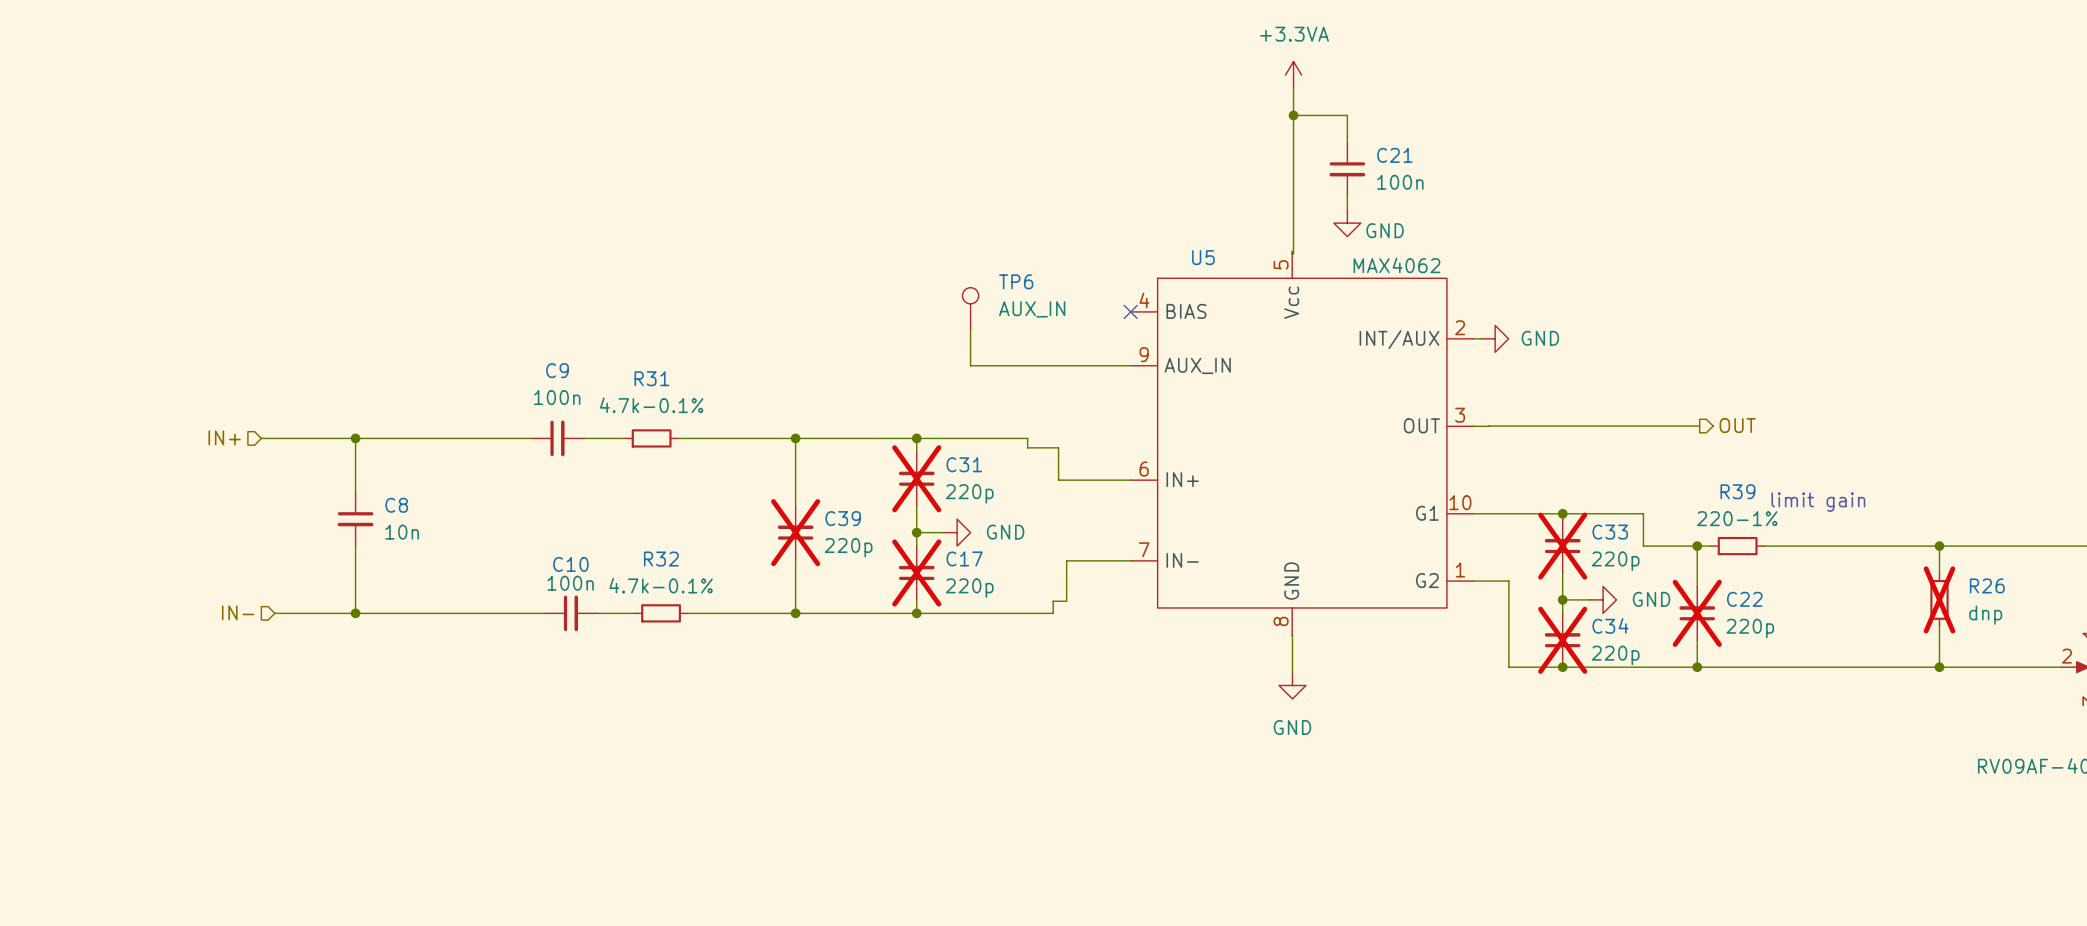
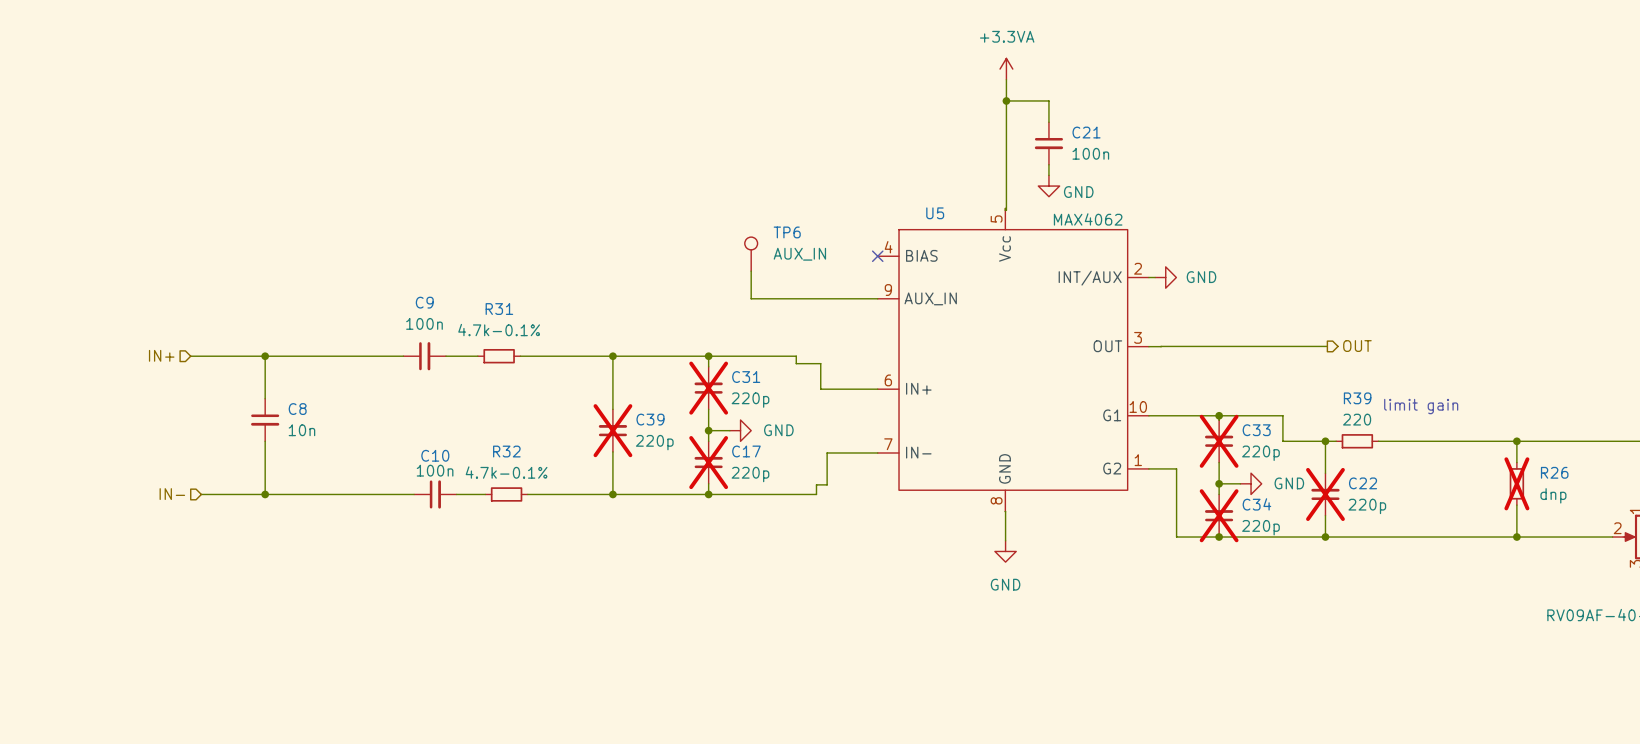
R39 value: 220-1% (1737, 518) -> 220 (1357, 419)

